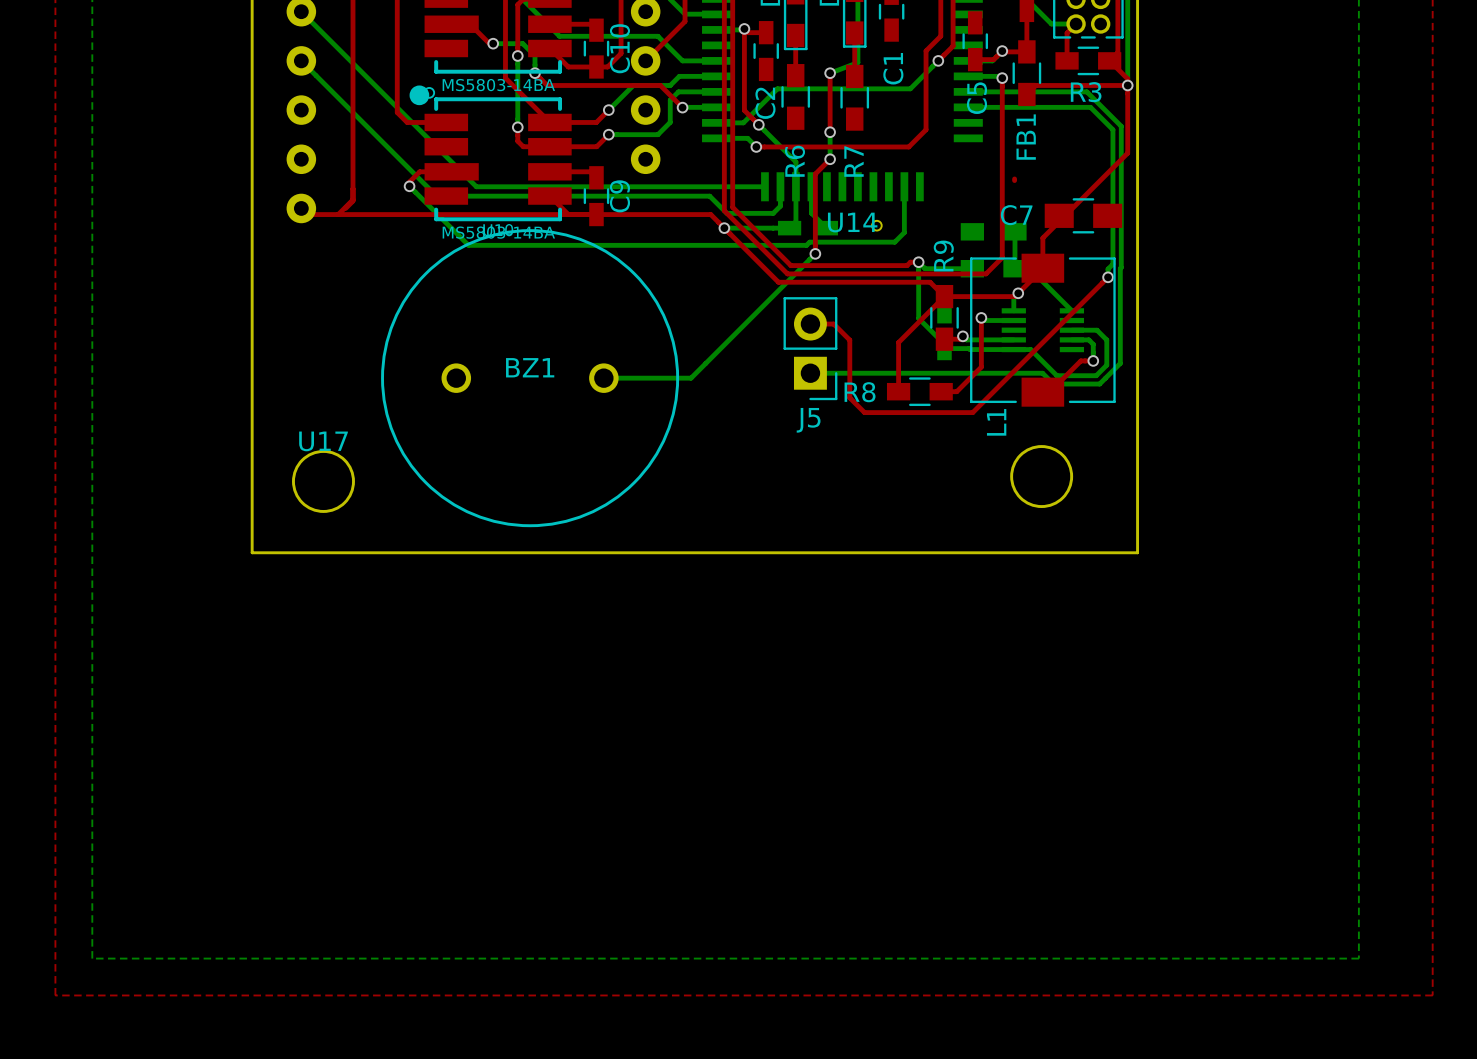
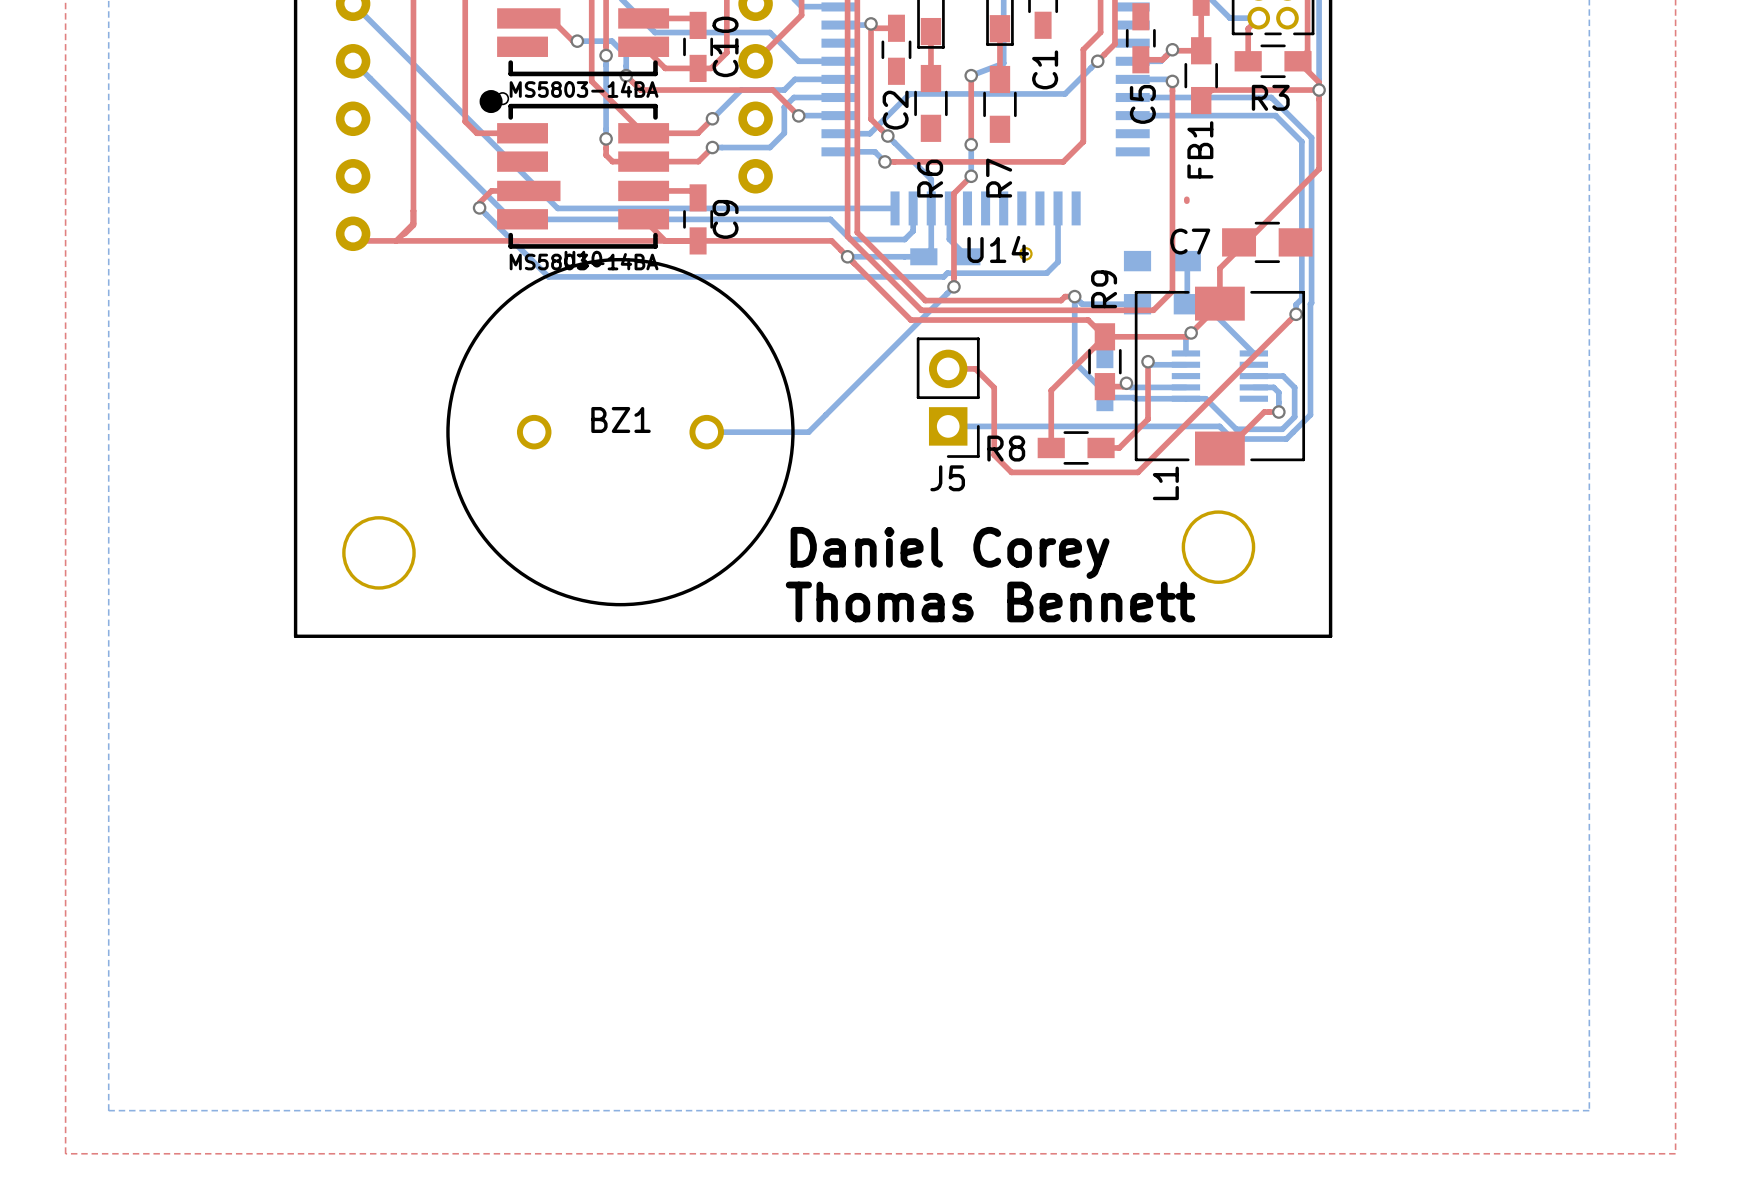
U17 name: U17 (323, 441) -> none
text: none -> Daniel Corey (950, 552)
text: none -> Thomas Bennett (990, 601)

